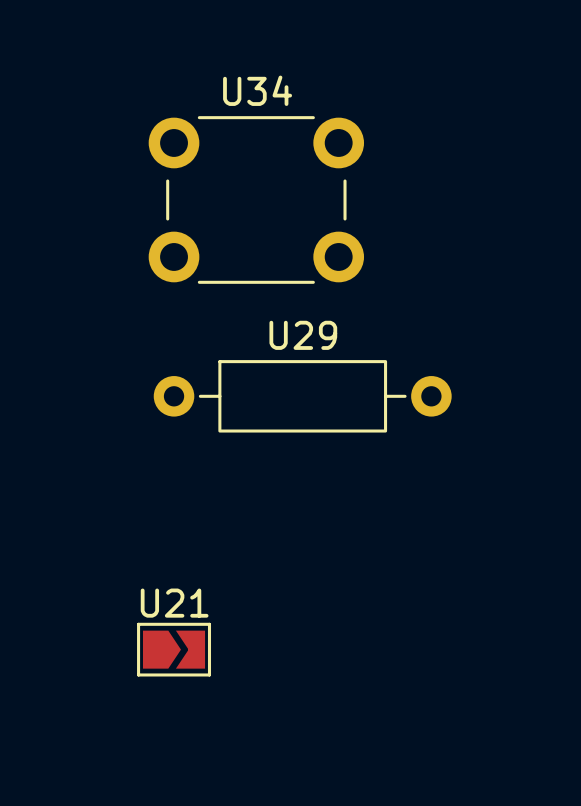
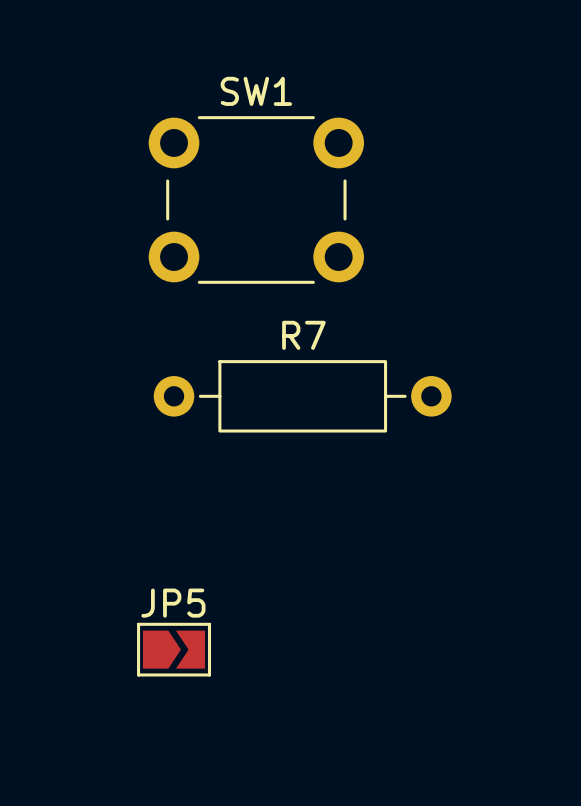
U34 name: U34 (257, 90) -> SW1 (256, 91)
U29 name: U29 (303, 335) -> R7 (303, 335)
U21 name: U21 (174, 603) -> JP5 (173, 603)

